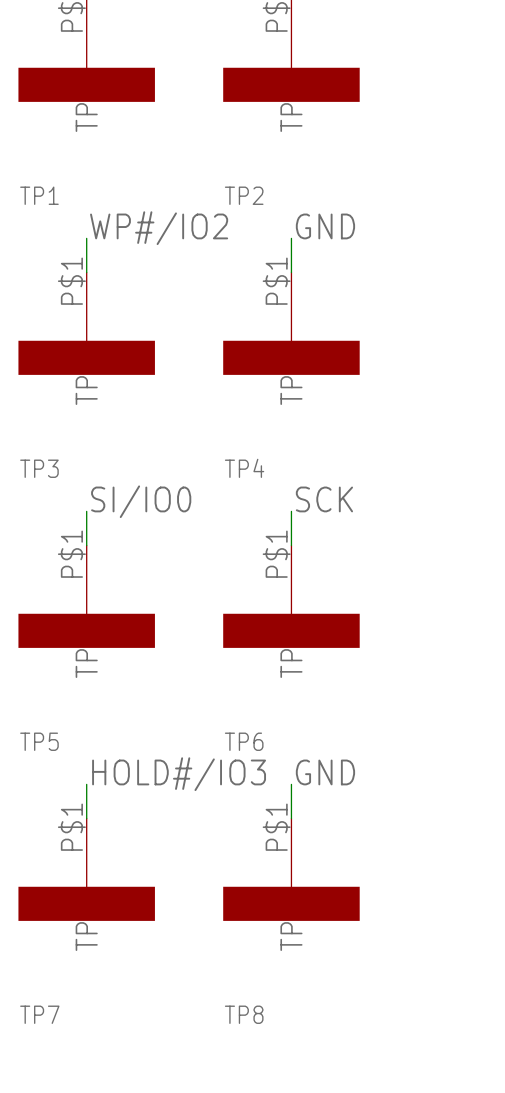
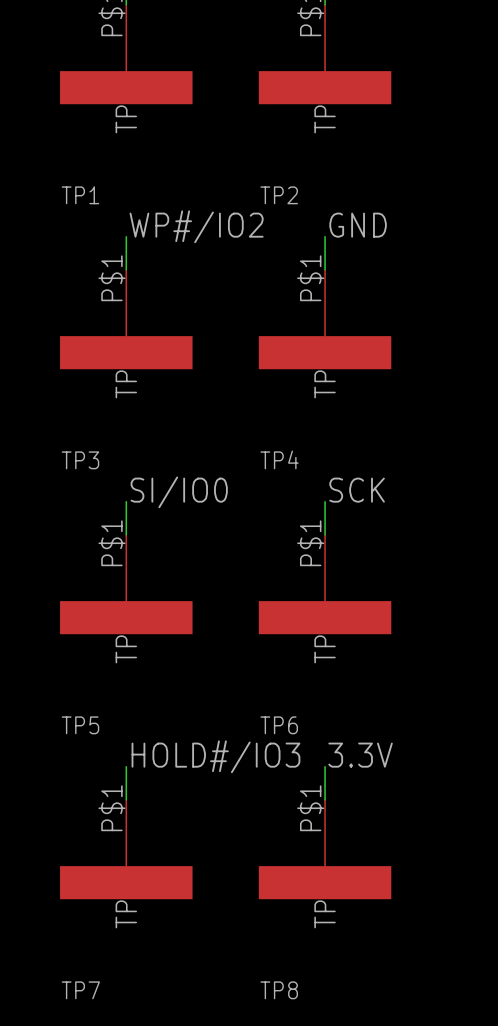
label: GND (325, 772) -> 3.3V (360, 755)

